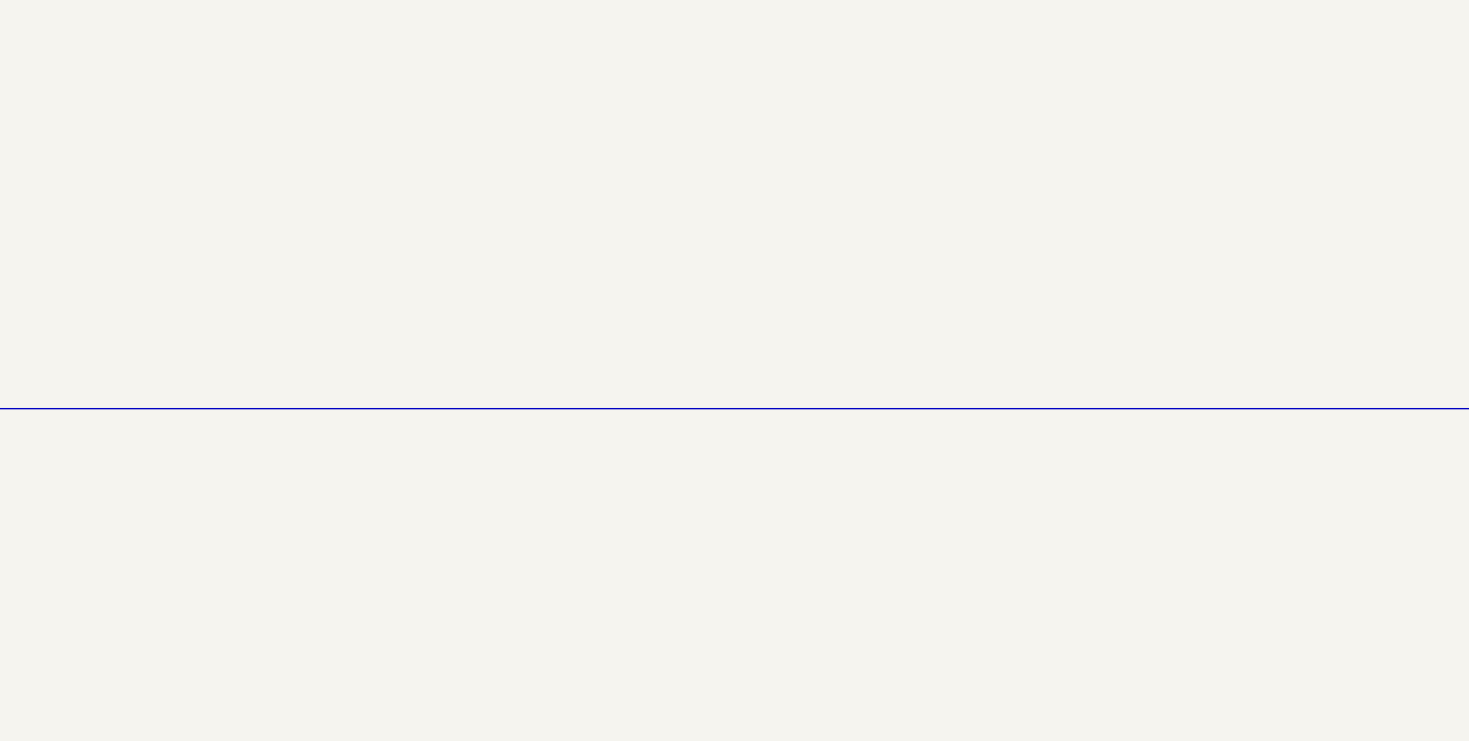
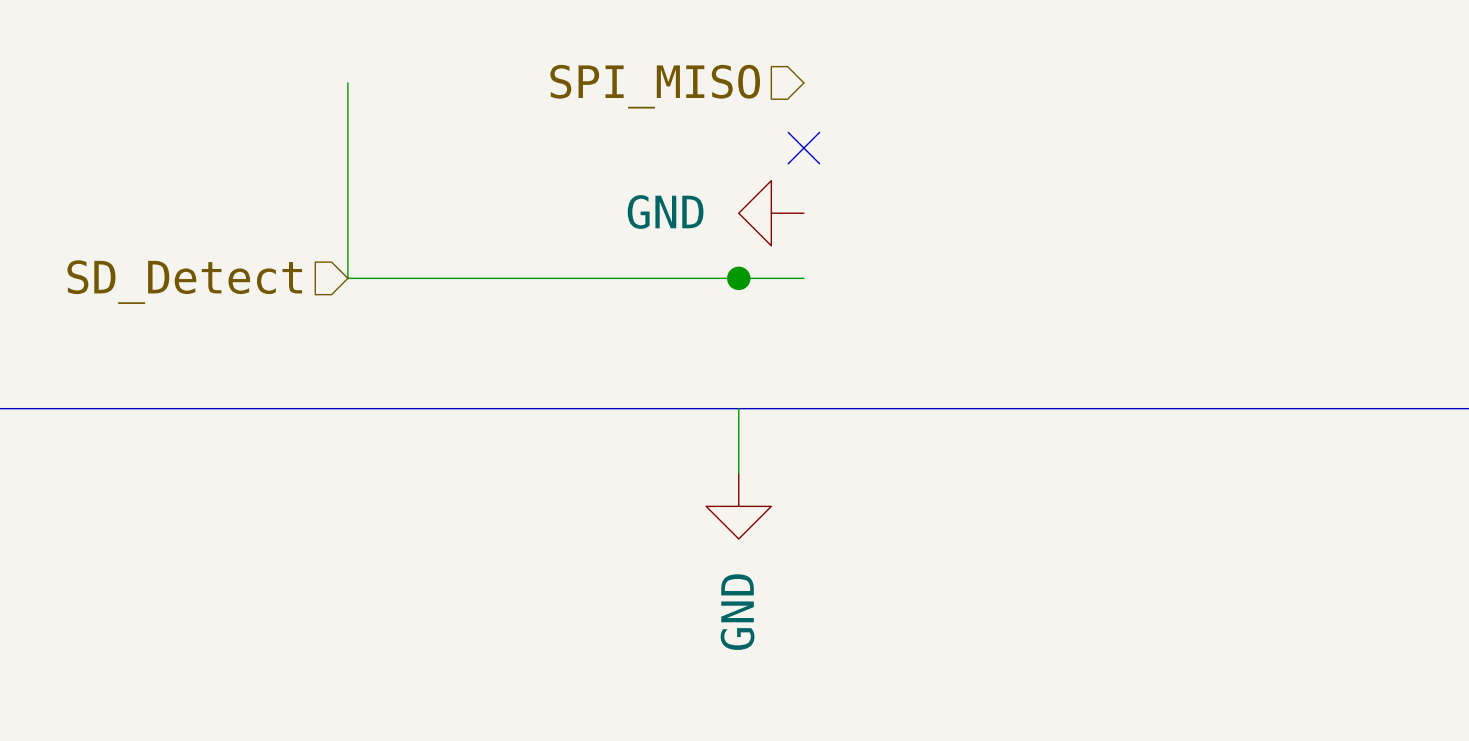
wire: none -> (347, 82) (347, 278) (803, 278)
hierarchical label: none -> SPI_MISO (655, 86)
no-connect mark: none -> (803, 148)
power symbol: none -> GND (771, 213)
junction: none -> (738, 278)
hierarchical label: none -> SD_Detect (184, 282)
wire: none -> (738, 408) (738, 473)
power symbol: none -> GND (738, 506)

